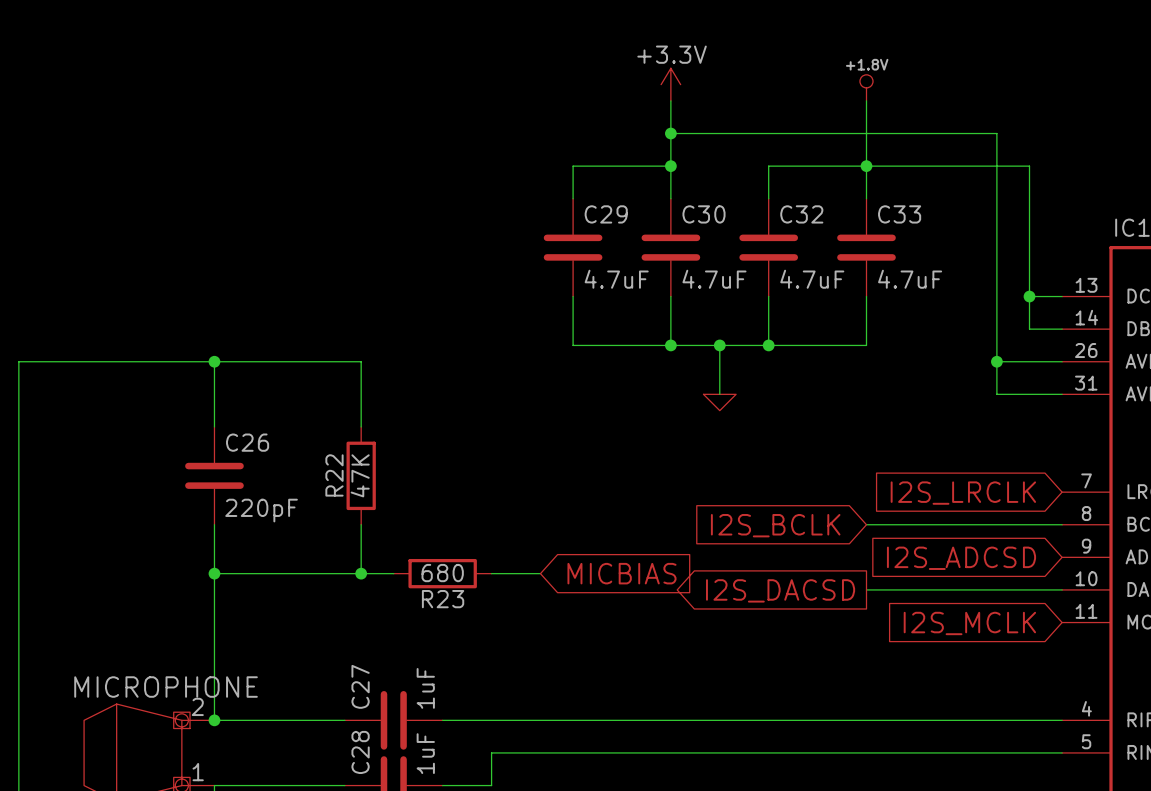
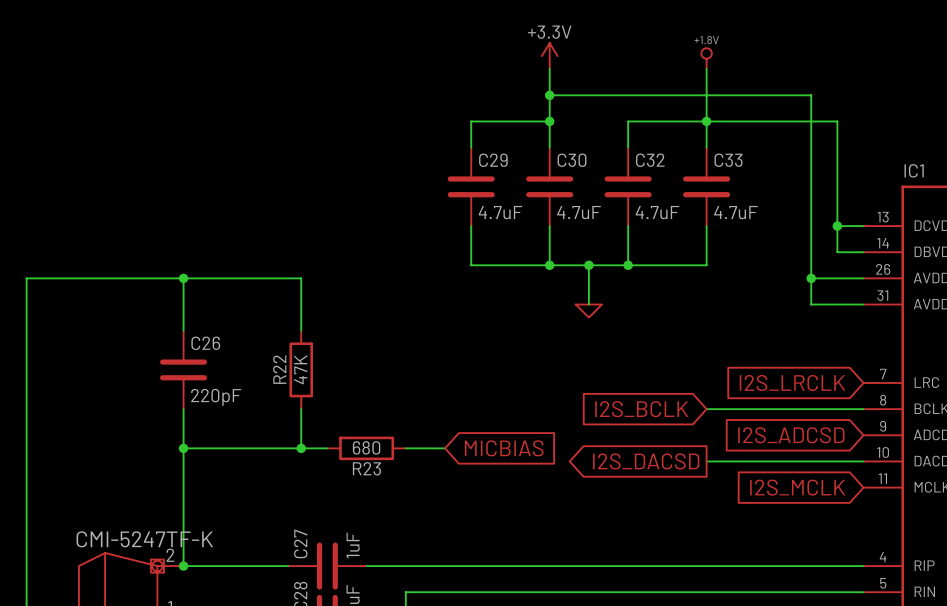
part value: MICROPHONE (166, 687) -> CMI-5247TF-K (144, 539)

